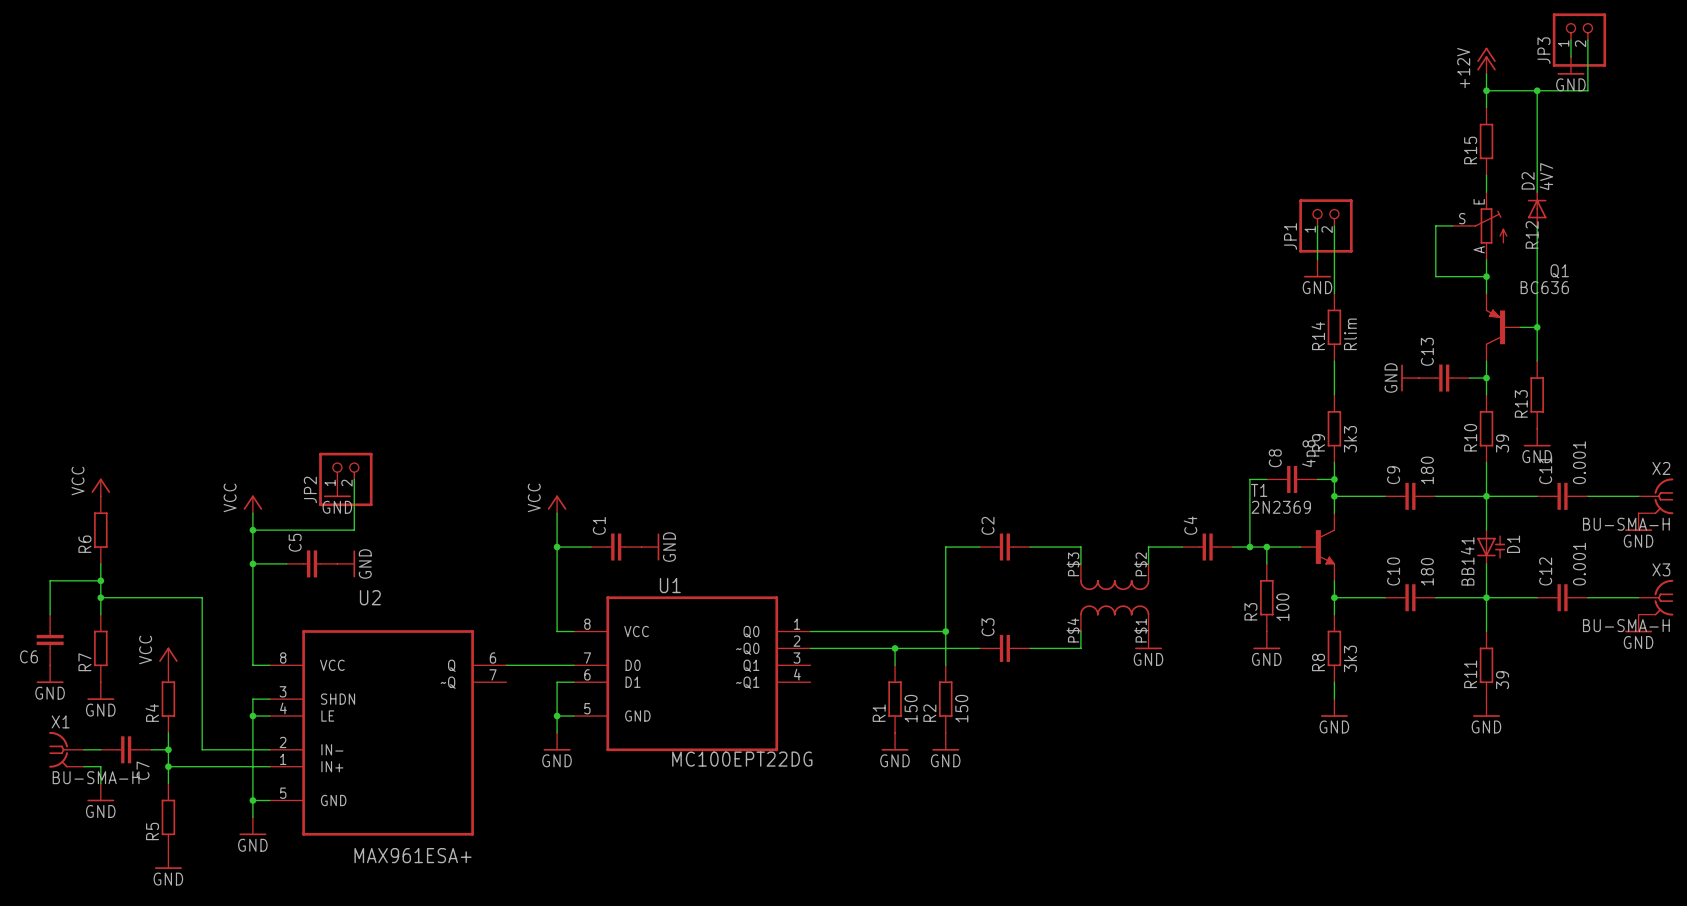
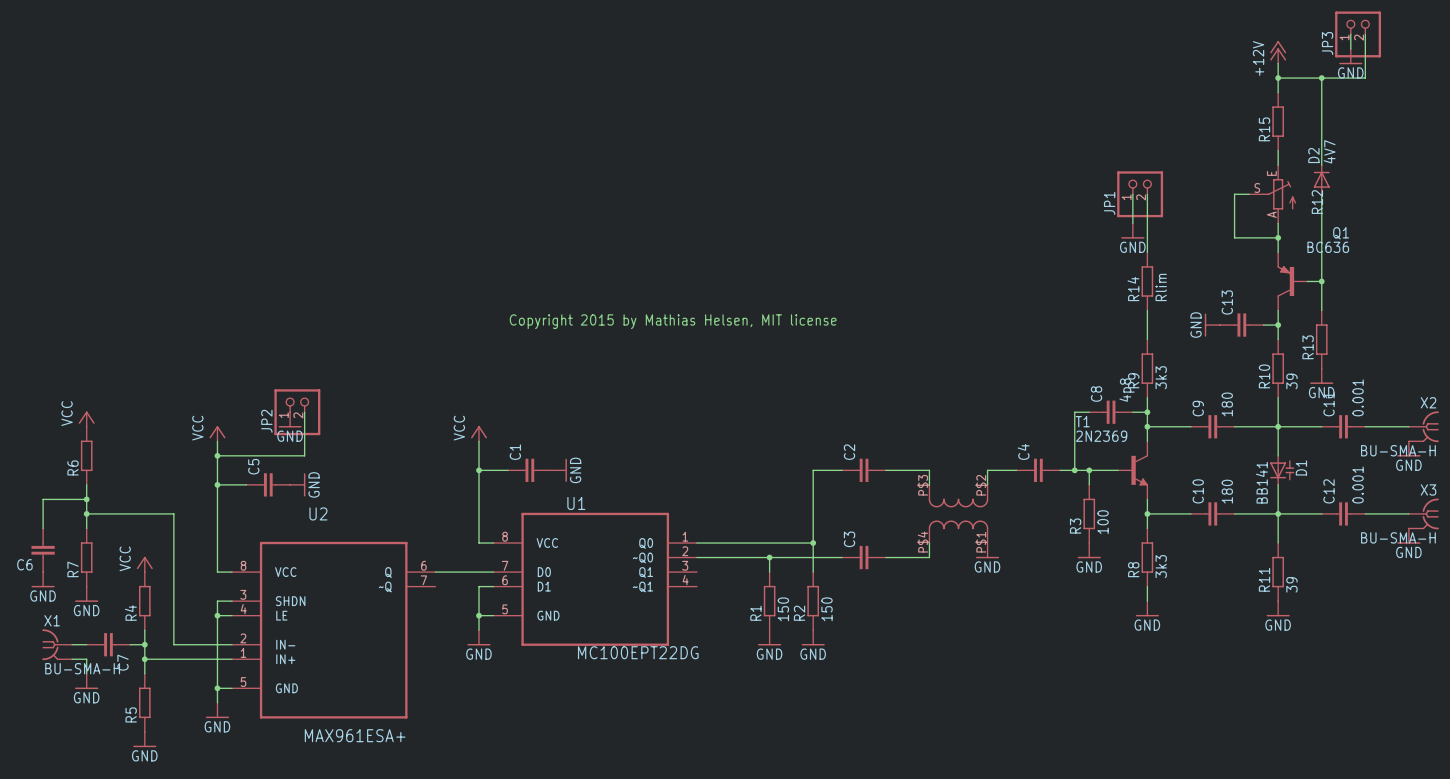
text: none -> Copyright 2015 by Mathias Helsen, MIT license (673, 321)

